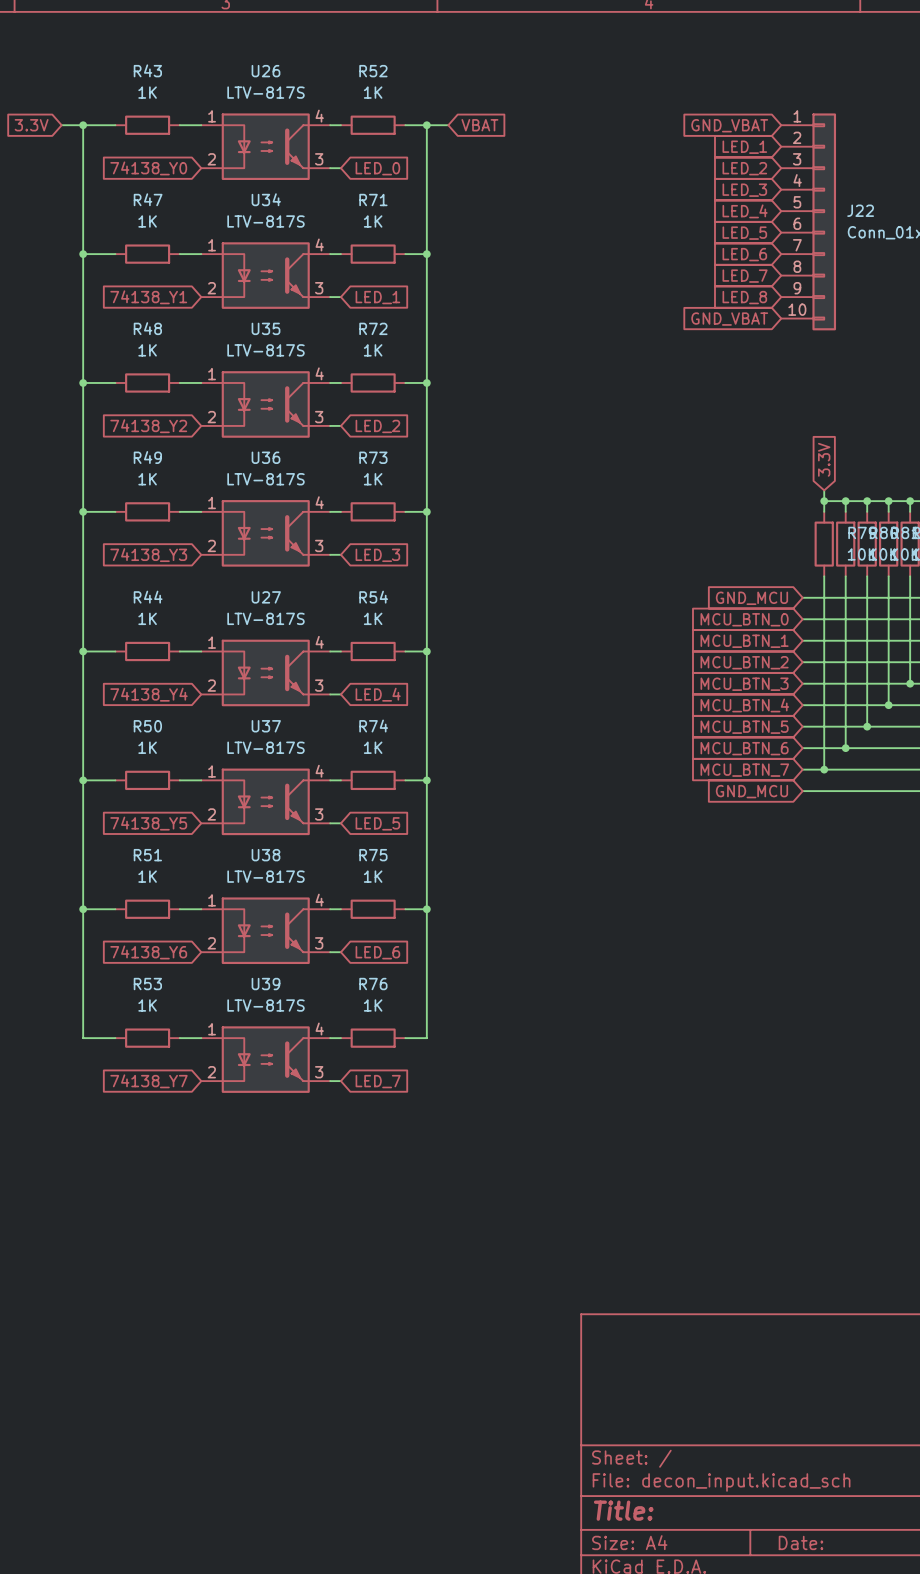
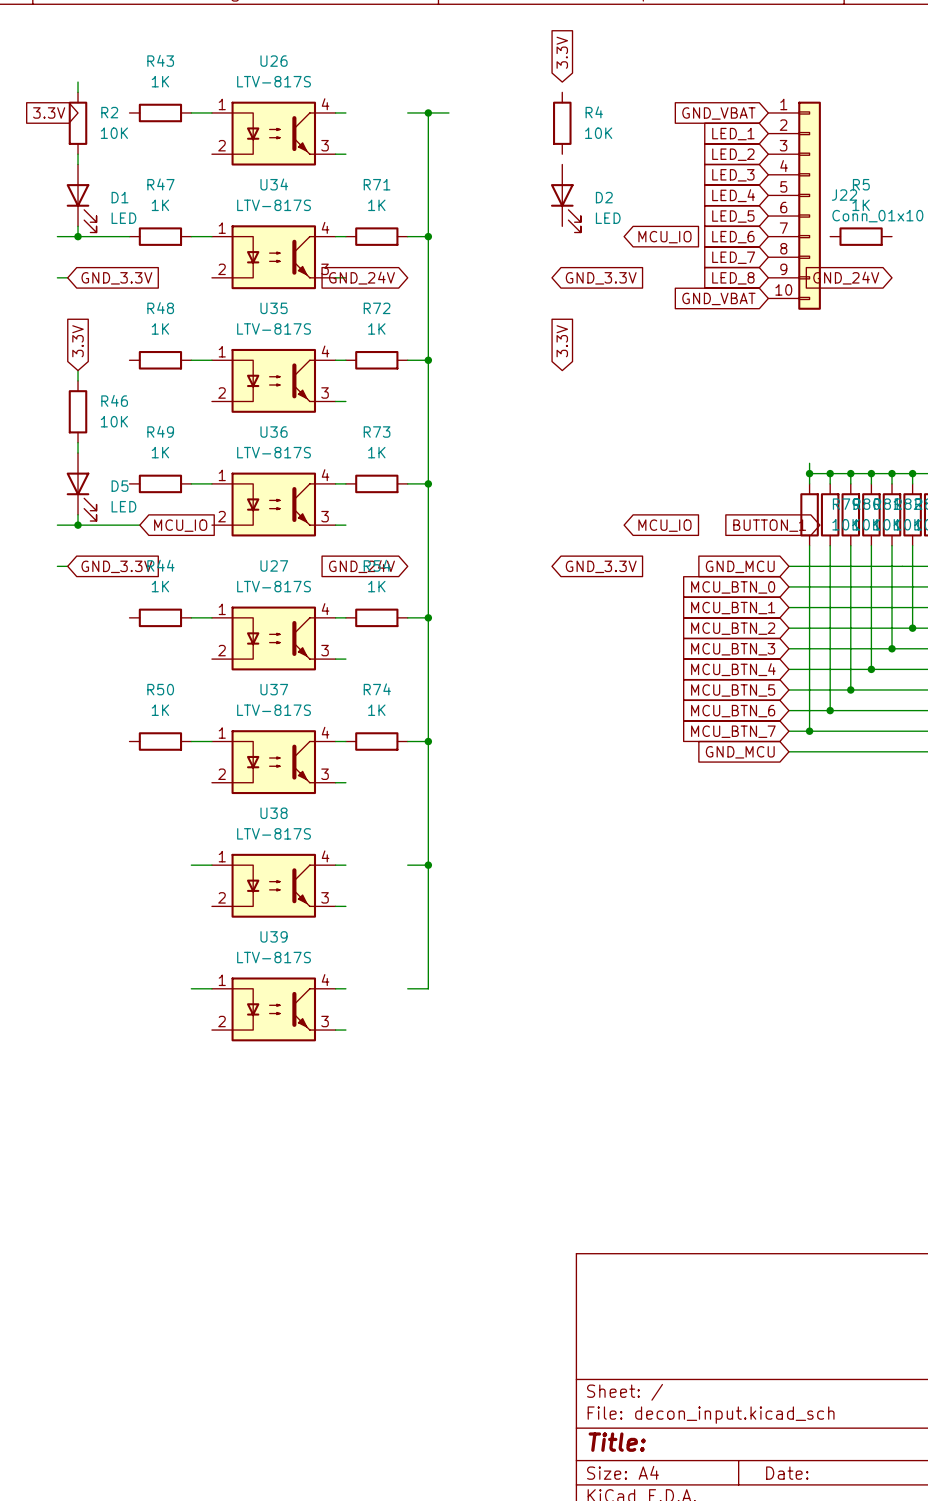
global label: none -> 3.3V (562, 52)
wire: none -> (78, 82) (78, 92)
wire: (61, 125) (115, 125) -> none
wire: (83, 125) (83, 1038) (115, 1038) -> none
junction: (83, 125) -> none
R52: 1K (373, 125) -> none
global label: VBAT (479, 125) -> none
R2: none -> 10K (78, 123)
R4: none -> 10K (562, 123)
wire: none -> (78, 154) (78, 164)
global label: 74138_Y0 (148, 168) -> none
global label: LED_0 (377, 168) -> none
D1: none -> LED (81, 198)
D2: none -> LED (565, 198)
wire: none -> (78, 226) (78, 236)
wire: none -> (57, 236) (98, 236)
junction position: (83, 254) -> (78, 236)
global label: none -> MCU_IO (664, 237)
R5: none -> 1K (861, 236)
wire: none -> (57, 277) (67, 277)
global label: none -> GND_3.3V (116, 278)
global label: 74138_Y1 (148, 297) -> none
global label: none -> GND_24V (361, 278)
global label: LED_1 (377, 297) -> none
global label: none -> GND_3.3V (601, 278)
global label: none -> GND_24V (846, 278)
global label: none -> 3.3V (78, 341)
global label: none -> 3.3V (562, 341)
wire: (83, 382) (115, 382) -> none
junction: (83, 382) -> none
wire: none -> (78, 370) (78, 380)
global label: 74138_Y2 (148, 426) -> none
global label: LED_2 (377, 426) -> none
R46: none -> 10K (78, 411)
global label: 3.3V (824, 459) -> none
wire: none -> (78, 442) (78, 453)
wire: (83, 511) (115, 511) -> none
junction position: (83, 511) -> (78, 525)
D5: none -> LED (81, 487)
wire: none -> (78, 514) (78, 525)
wire: none -> (57, 525) (139, 525)
global label: 74138_Y3 (148, 555) -> none
global label: none -> MCU_IO (180, 525)
global label: LED_3 (377, 555) -> none
global label: none -> MCU_IO (664, 525)
global label: none -> BUTTON_1 (769, 525)
wire: none -> (57, 566) (67, 566)
global label: none -> GND_3.3V (116, 566)
global label: none -> GND_24V (361, 566)
global label: none -> GND_3.3V (601, 566)
wire: (83, 651) (115, 651) -> none
junction: (83, 651) -> none
global label: 74138_Y4 (148, 694) -> none
global label: LED_4 (378, 694) -> none
wire: (83, 780) (115, 780) -> none
junction: (83, 780) -> none
global label: 74138_Y5 (148, 823) -> none
global label: LED_5 (377, 823) -> none
wire: (83, 909) (115, 909) -> none
junction: (83, 909) -> none
R51: 1K (147, 909) -> none
R75: 1K (373, 909) -> none
global label: 74138_Y6 (148, 952) -> none
global label: LED_6 (377, 952) -> none
R53: 1K (147, 1038) -> none
R76: 1K (373, 1038) -> none
global label: 74138_Y7 (148, 1081) -> none
global label: LED_7 (378, 1081) -> none

